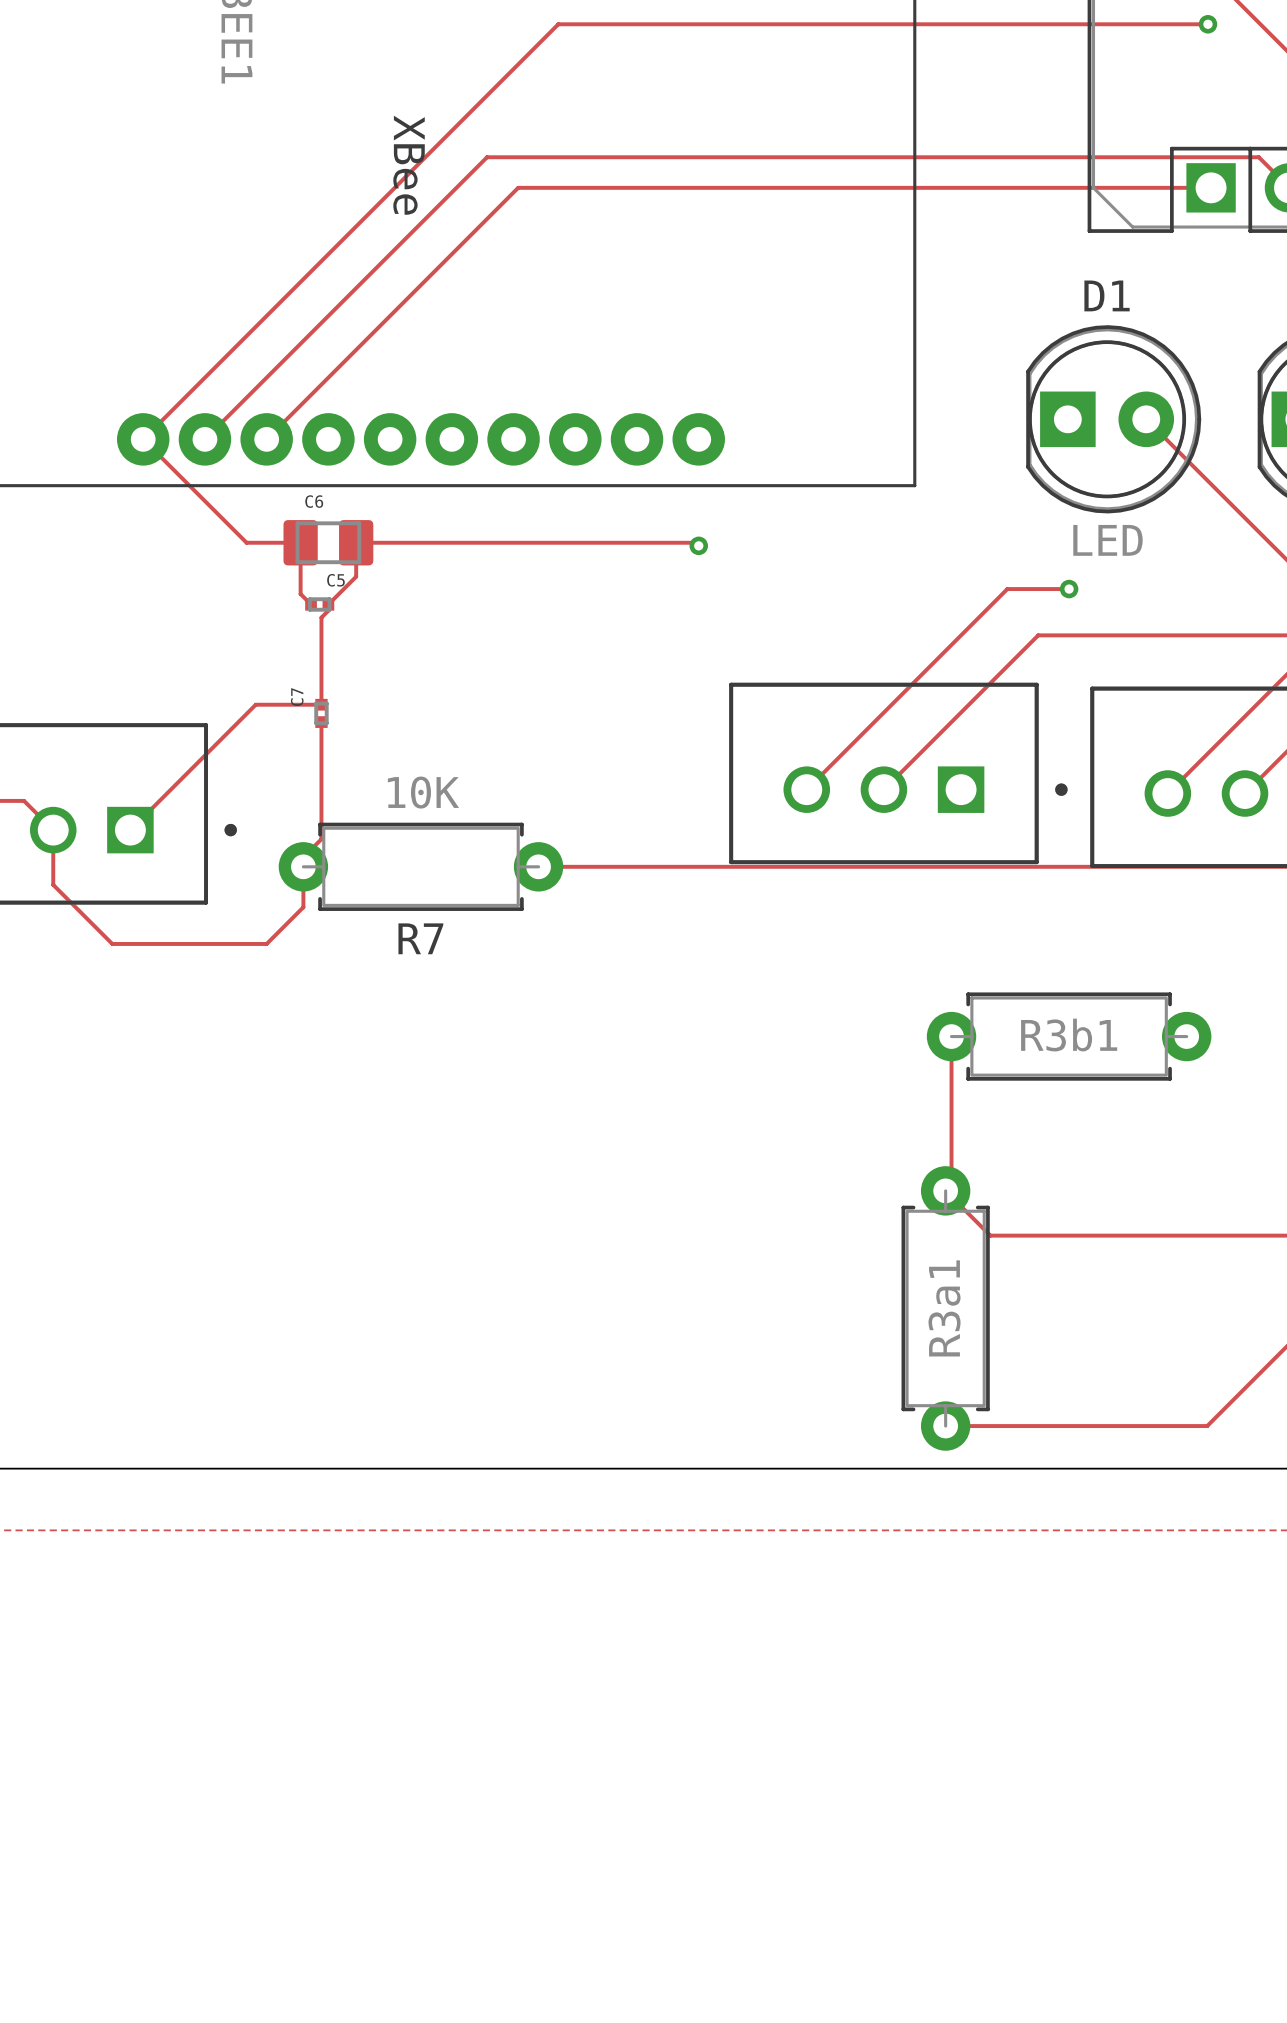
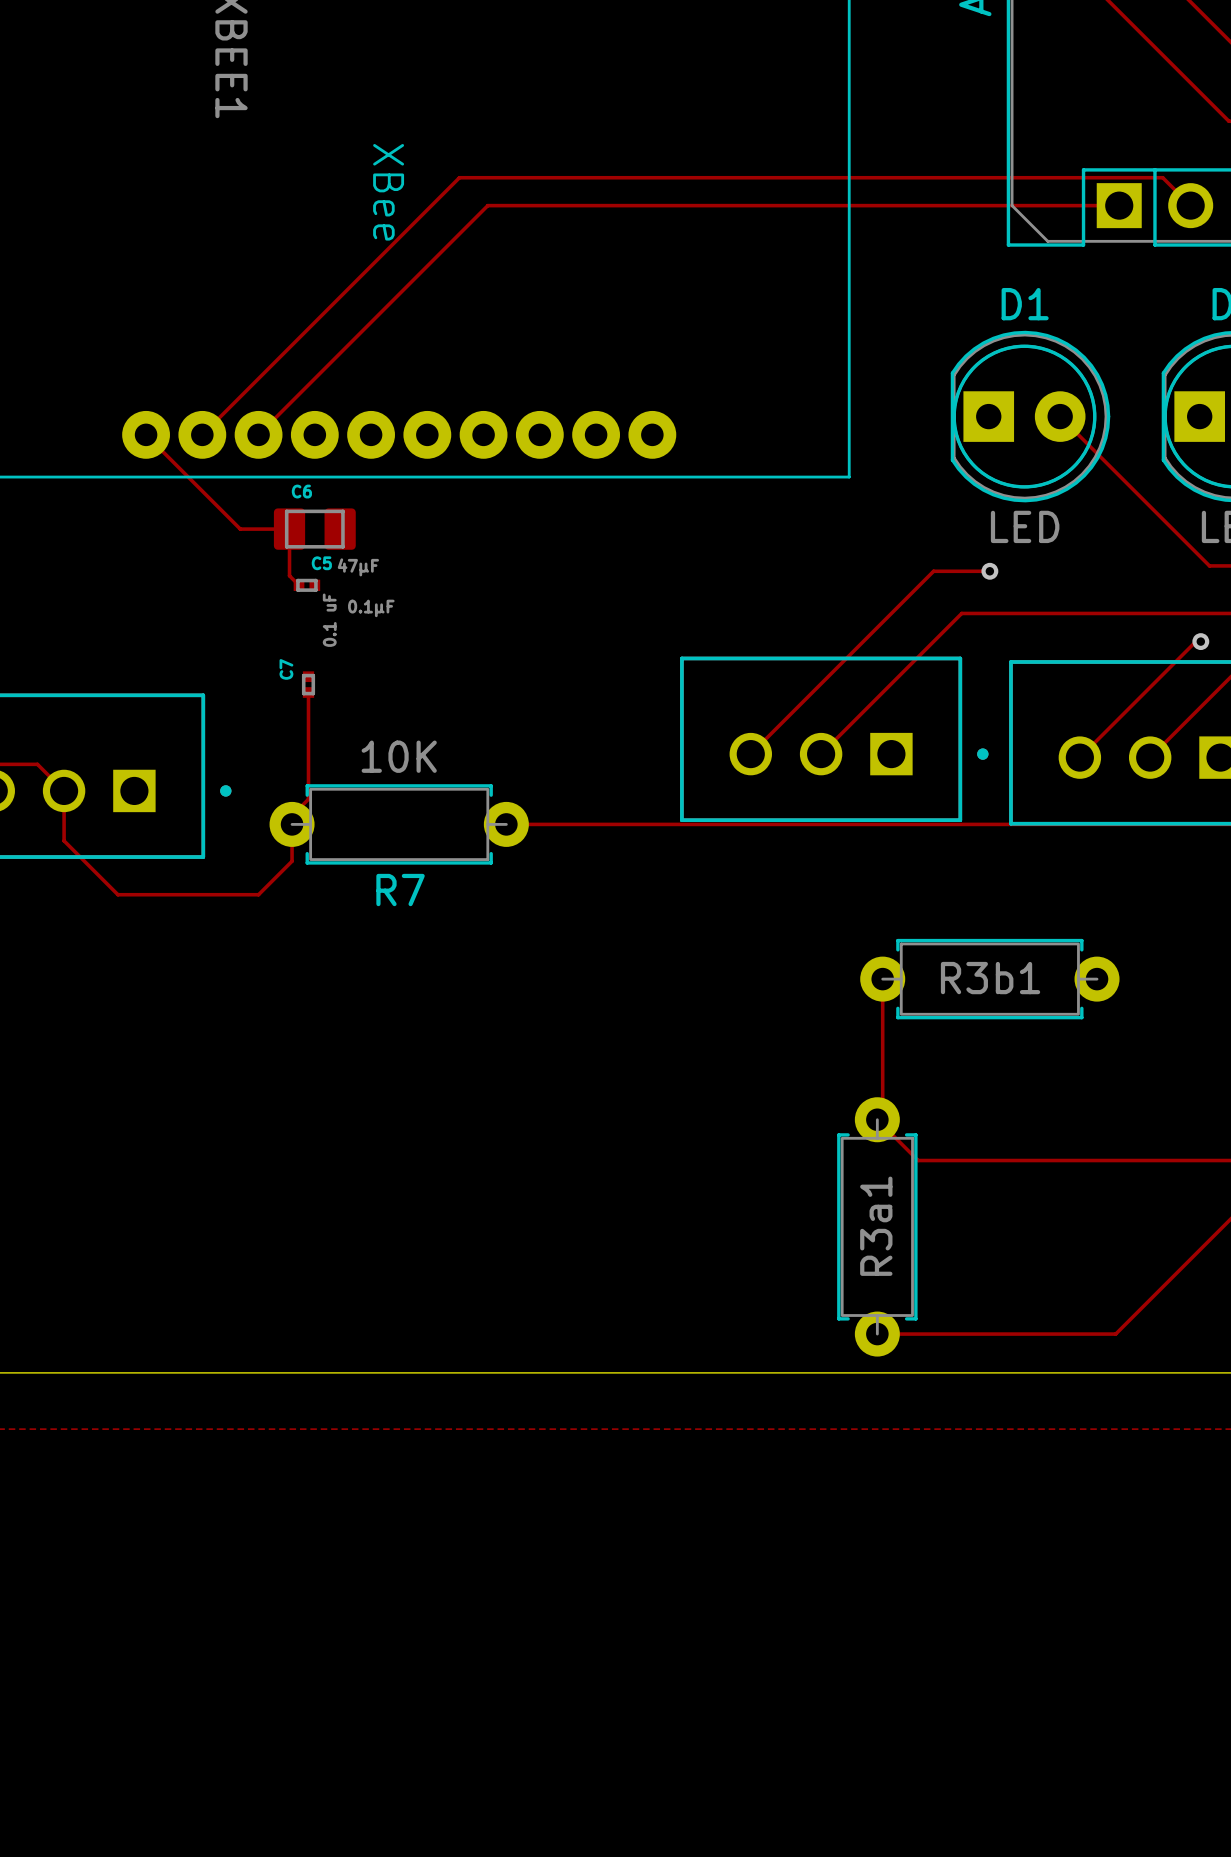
track: (1207, 24) (558, 24) (143, 439) -> none
via: (1207, 24) -> none
track: (698, 545) (695, 542) (356, 542) (356, 576) (328, 604) (328, 610) (321, 617) (321, 704) (255, 704) (130, 830) -> none
via: (698, 545) -> none
C6 value: none -> 47µF (358, 567)
C5 value: none -> 0.1µF (371, 608)
C7 value: none -> 0.1 uF (329, 620)

